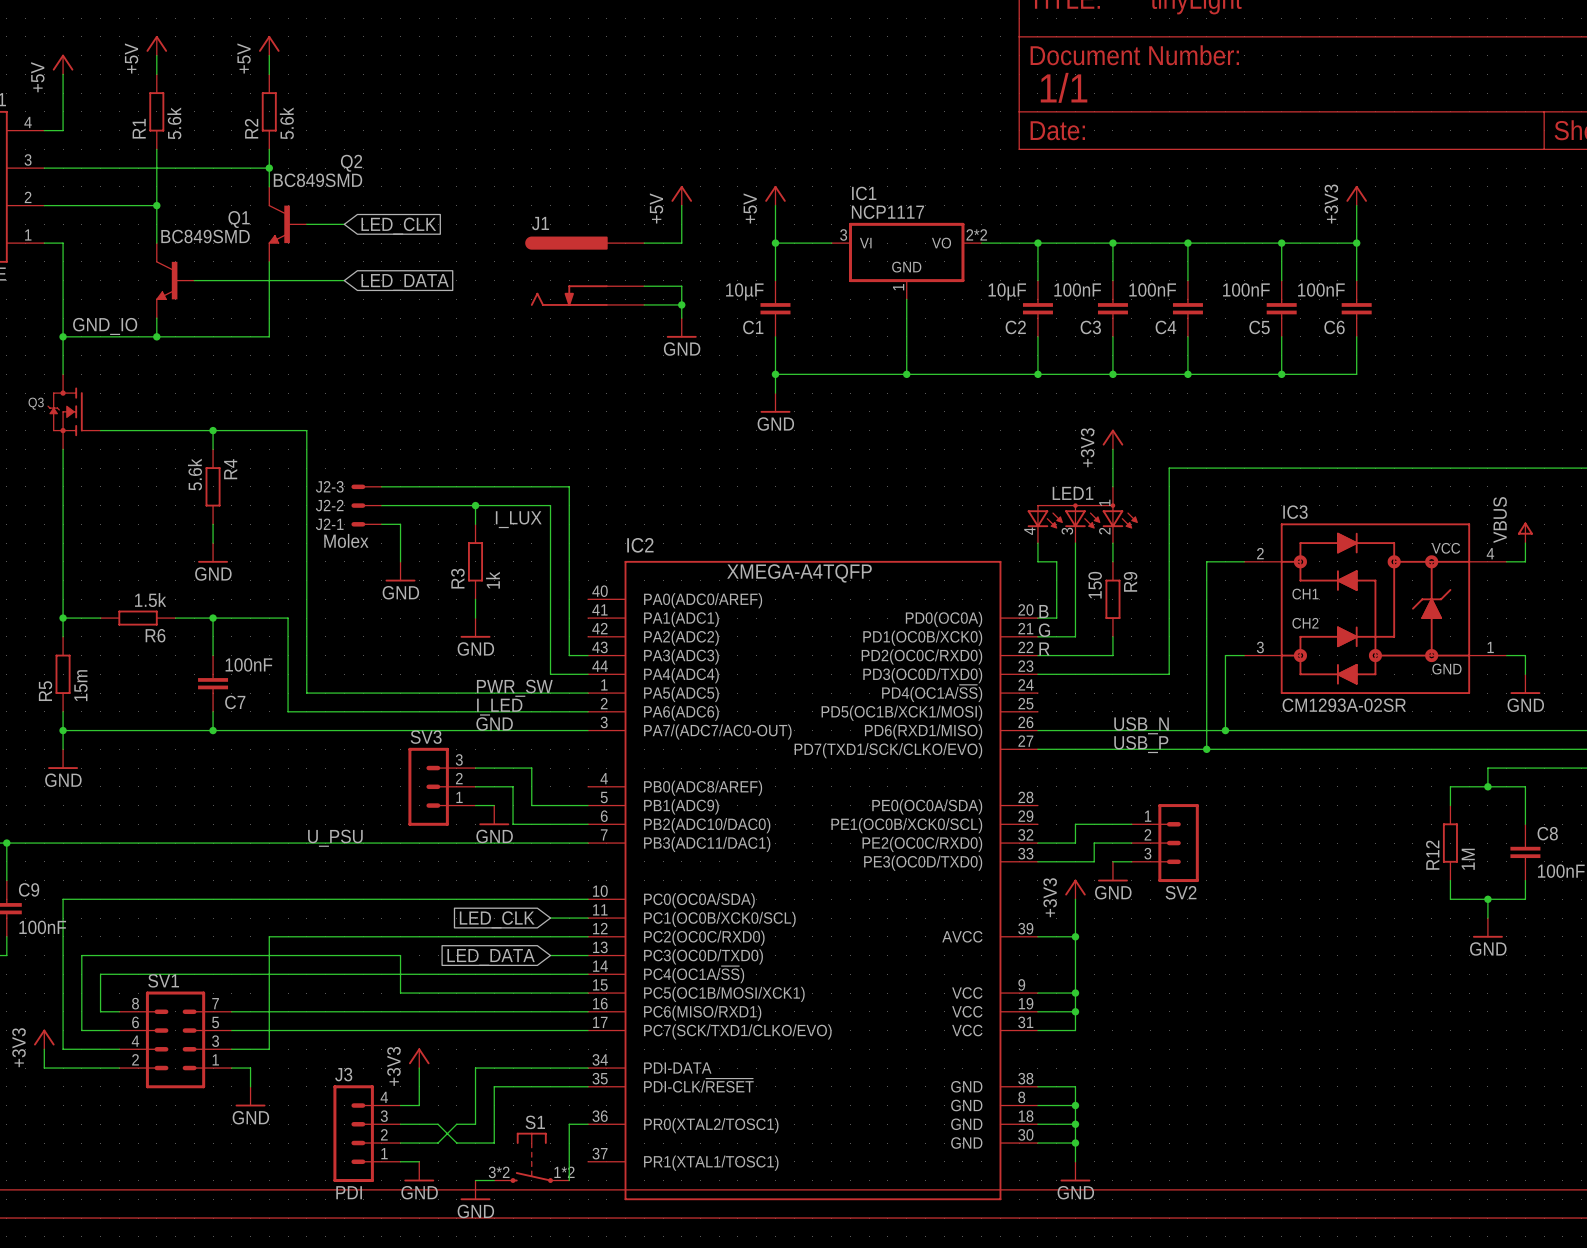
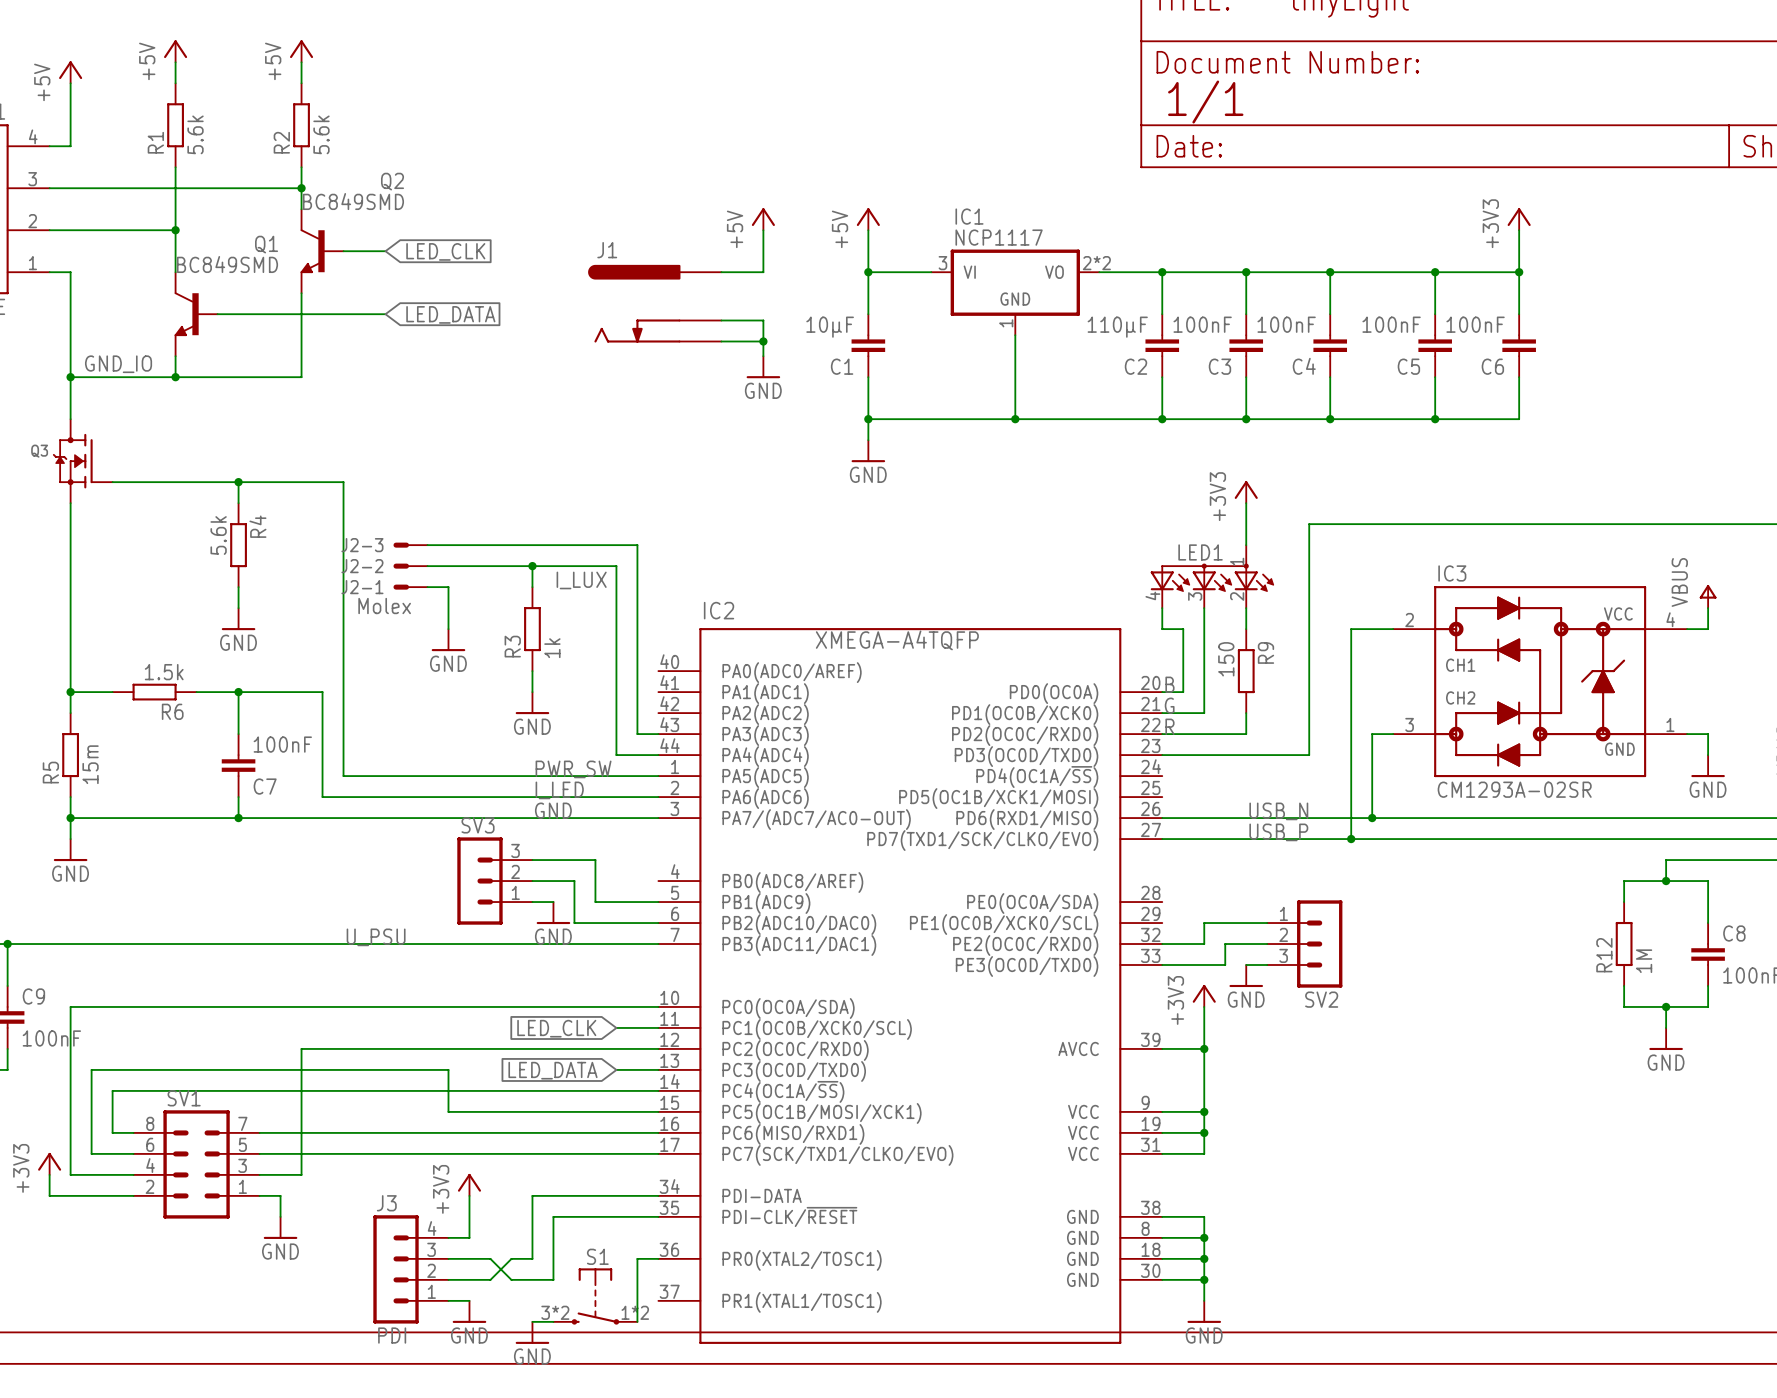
C2 value: 10µF (1007, 291) -> 110µF (1117, 327)

